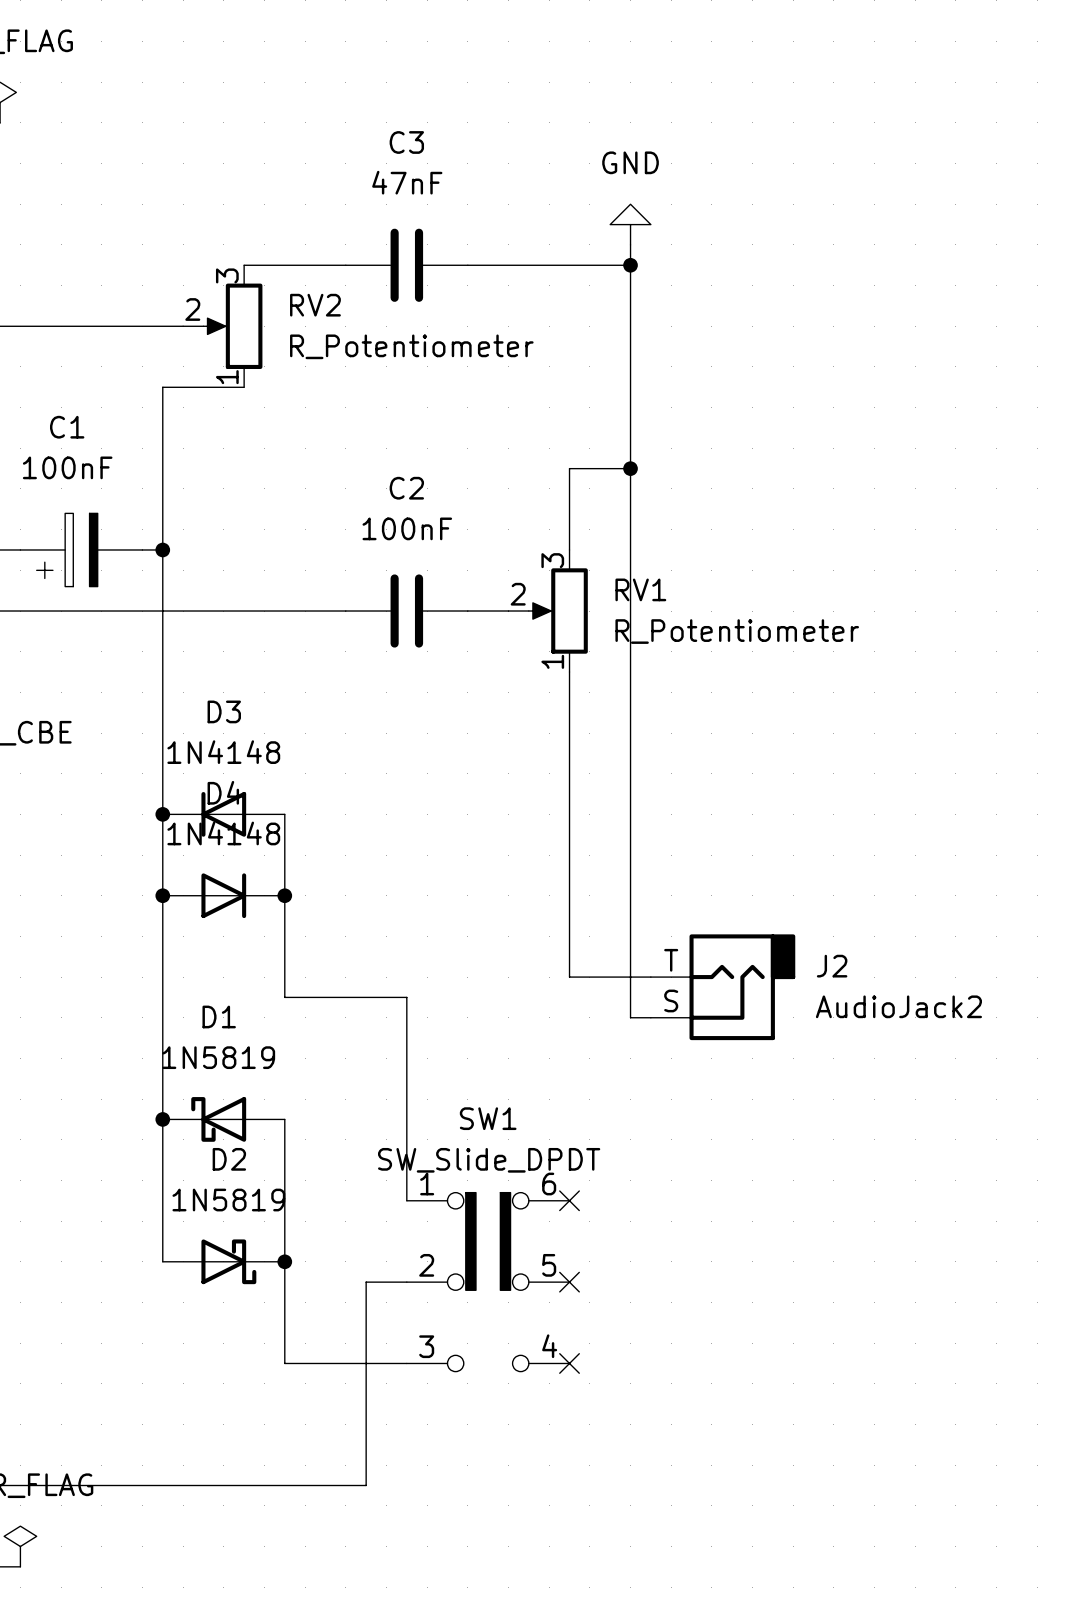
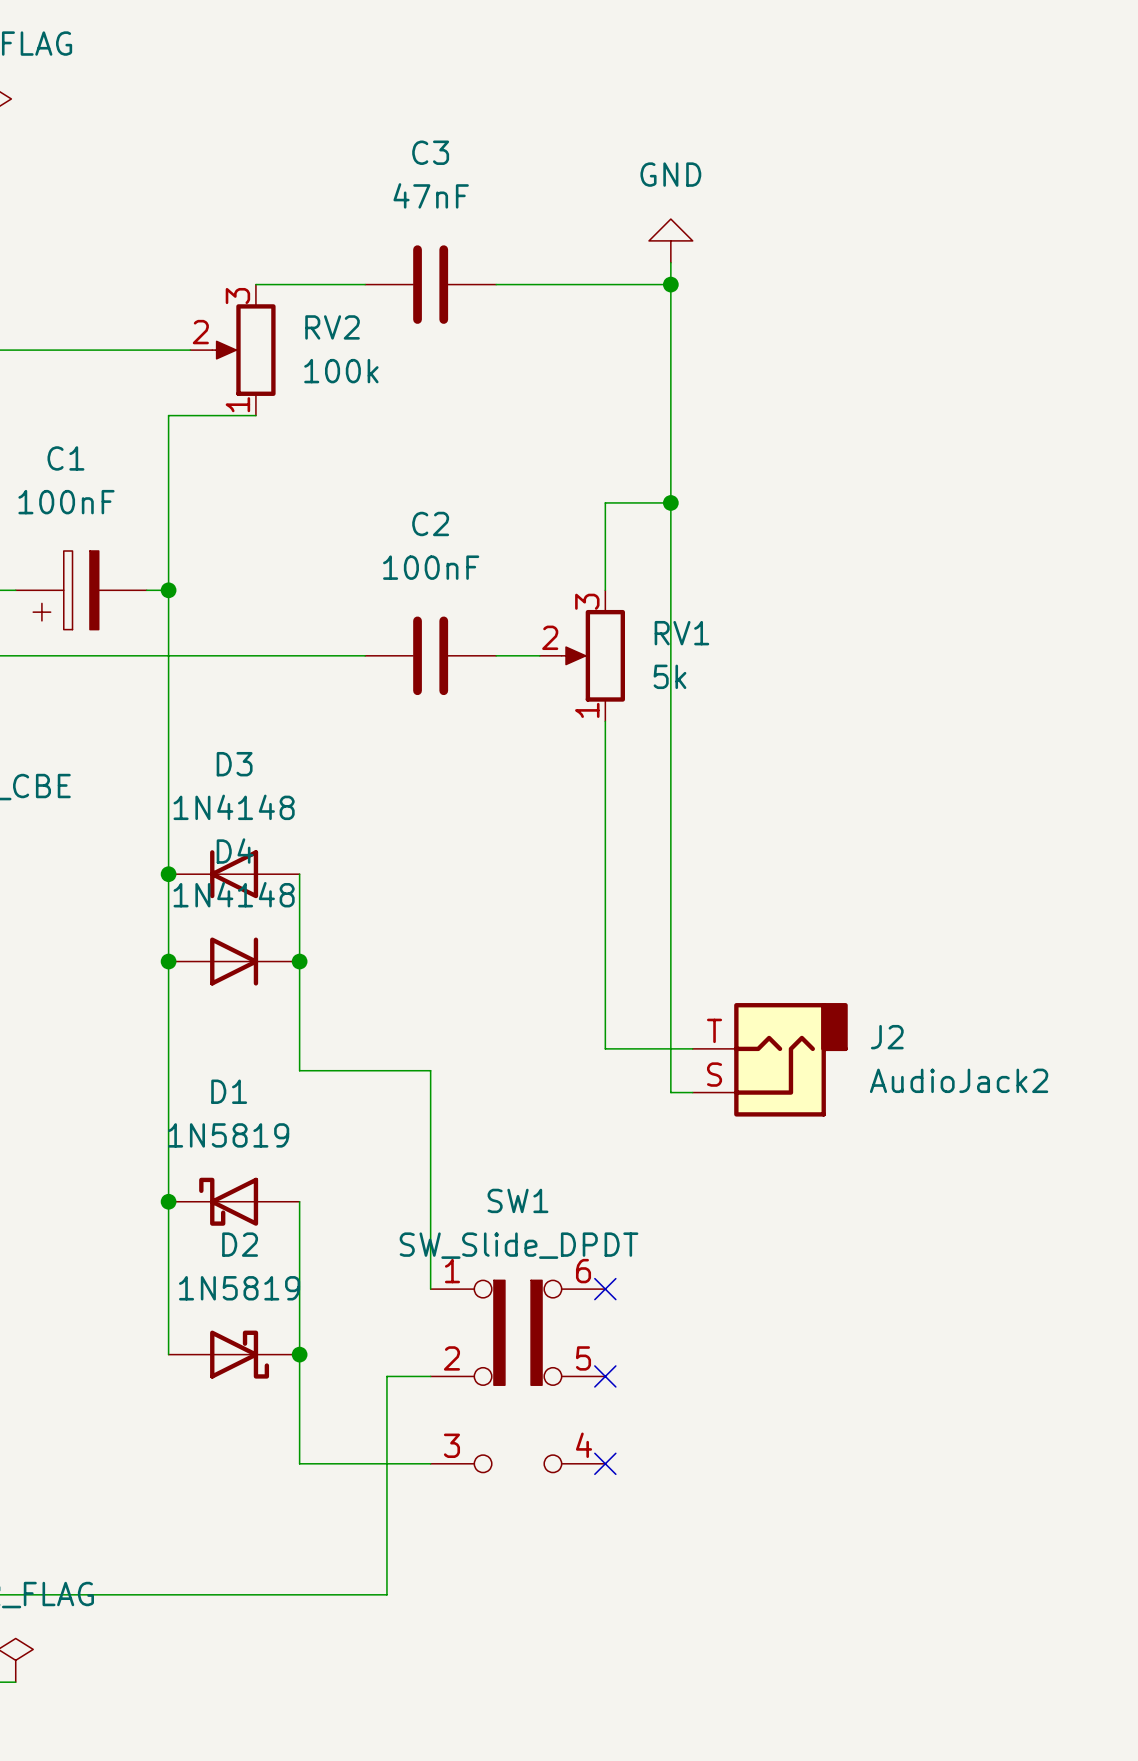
RV2 value: R_Potentiometer (411, 346) -> 100k (341, 371)
RV1 value: R_Potentiometer (737, 631) -> 5k (669, 676)

